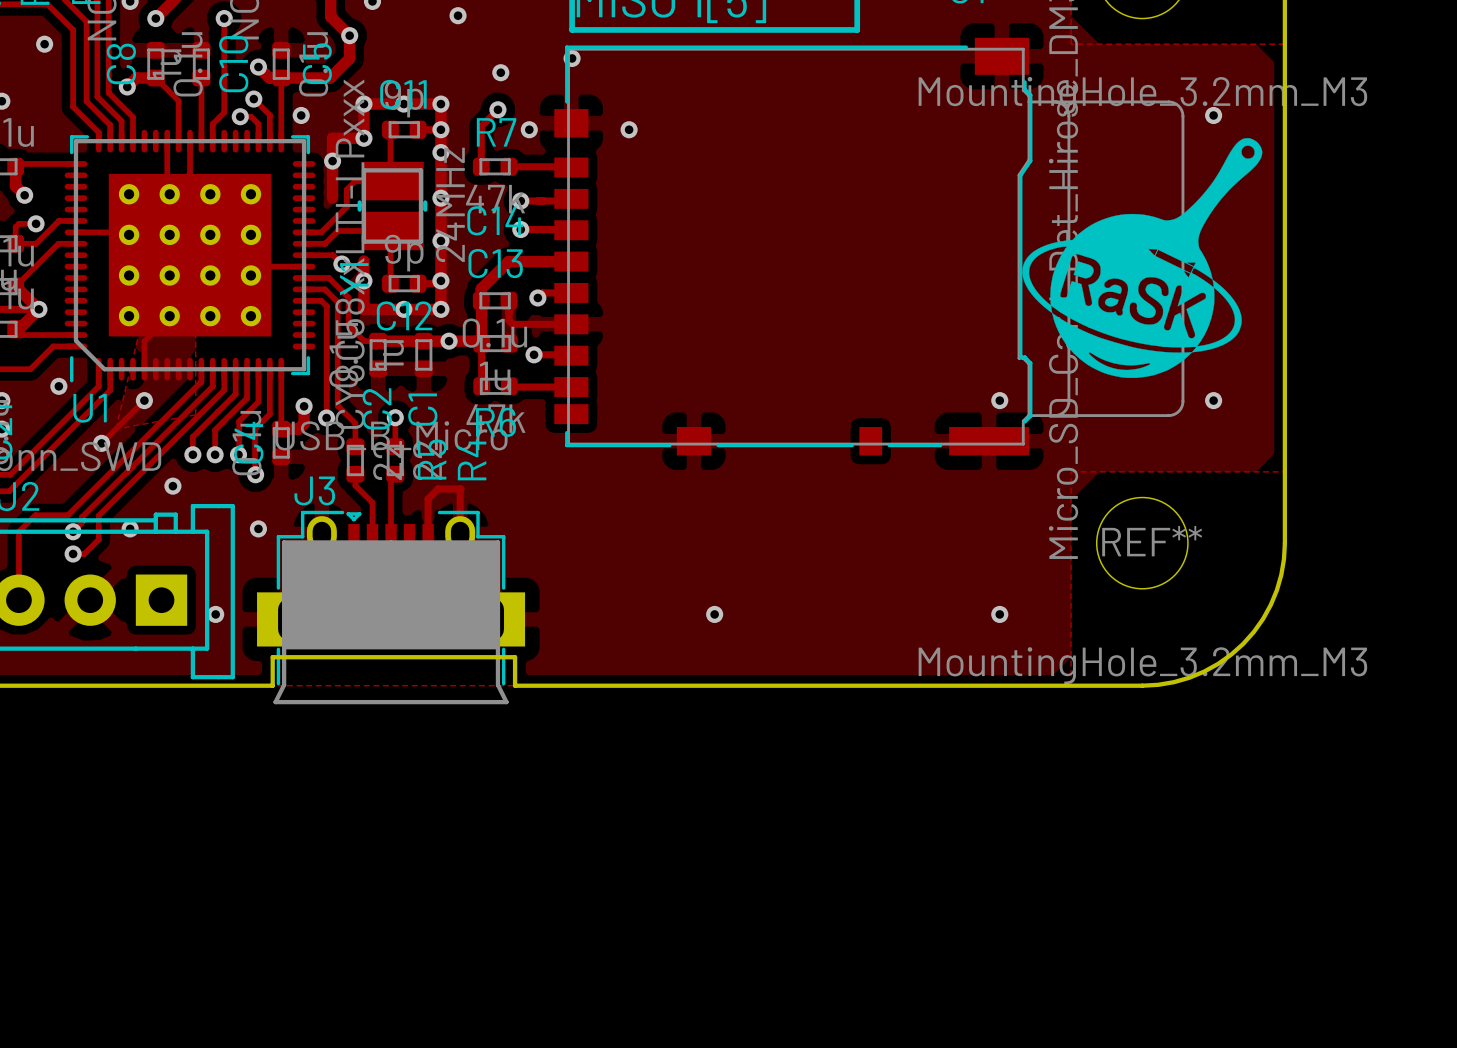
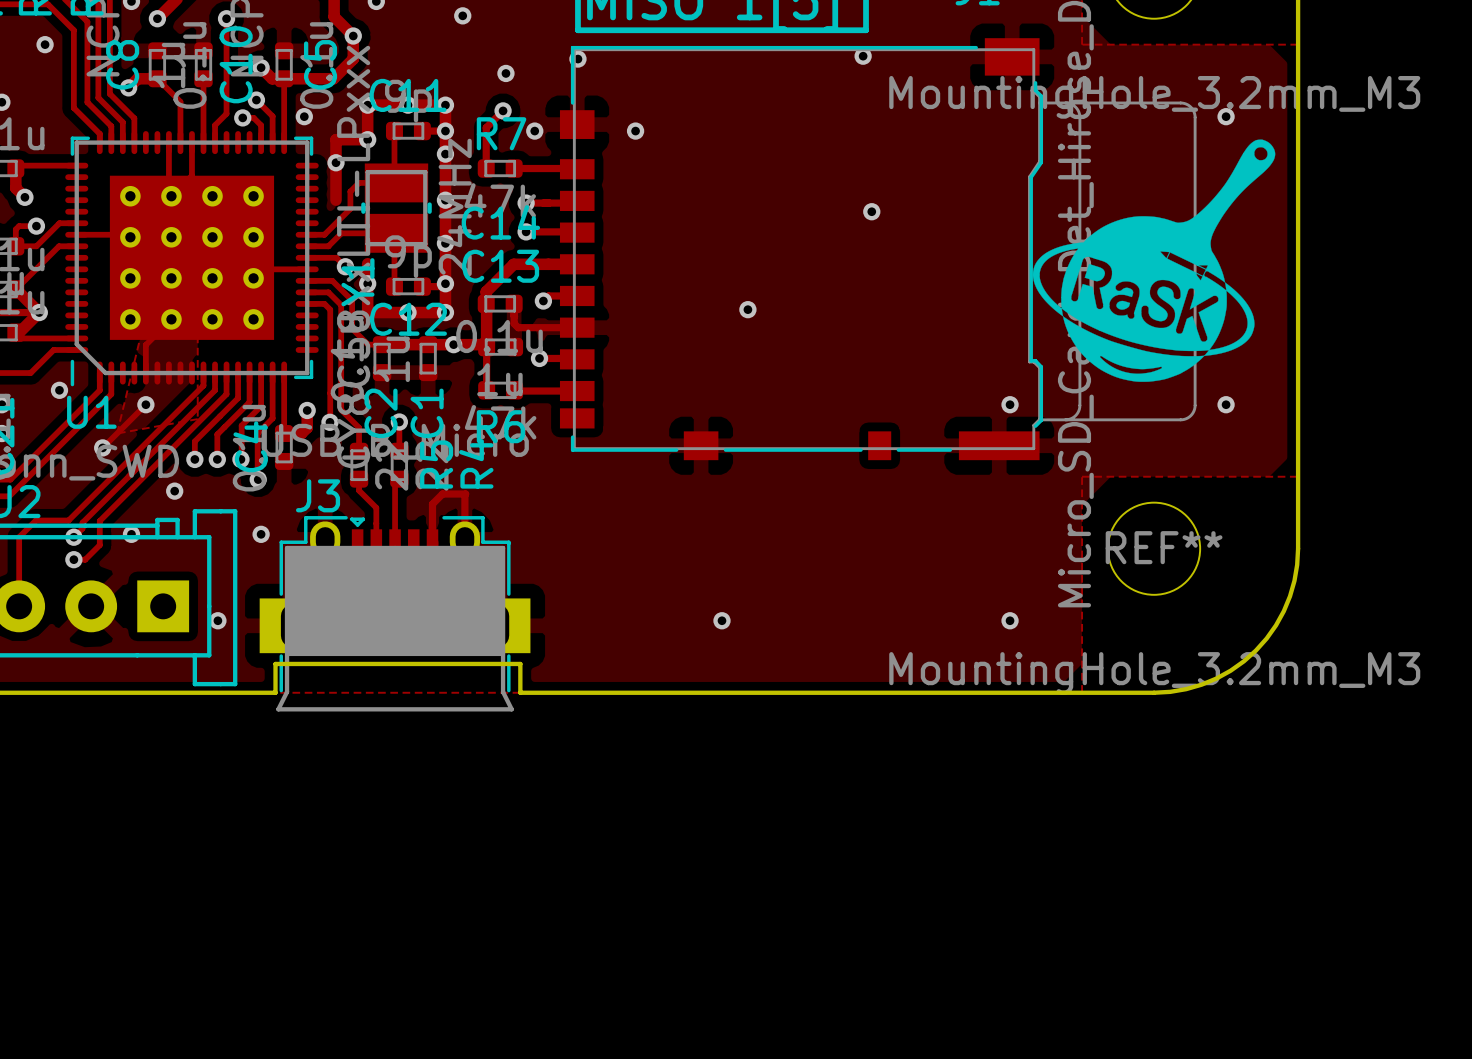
via: none -> (863, 56)
via: none -> (871, 211)
via: none -> (747, 309)

